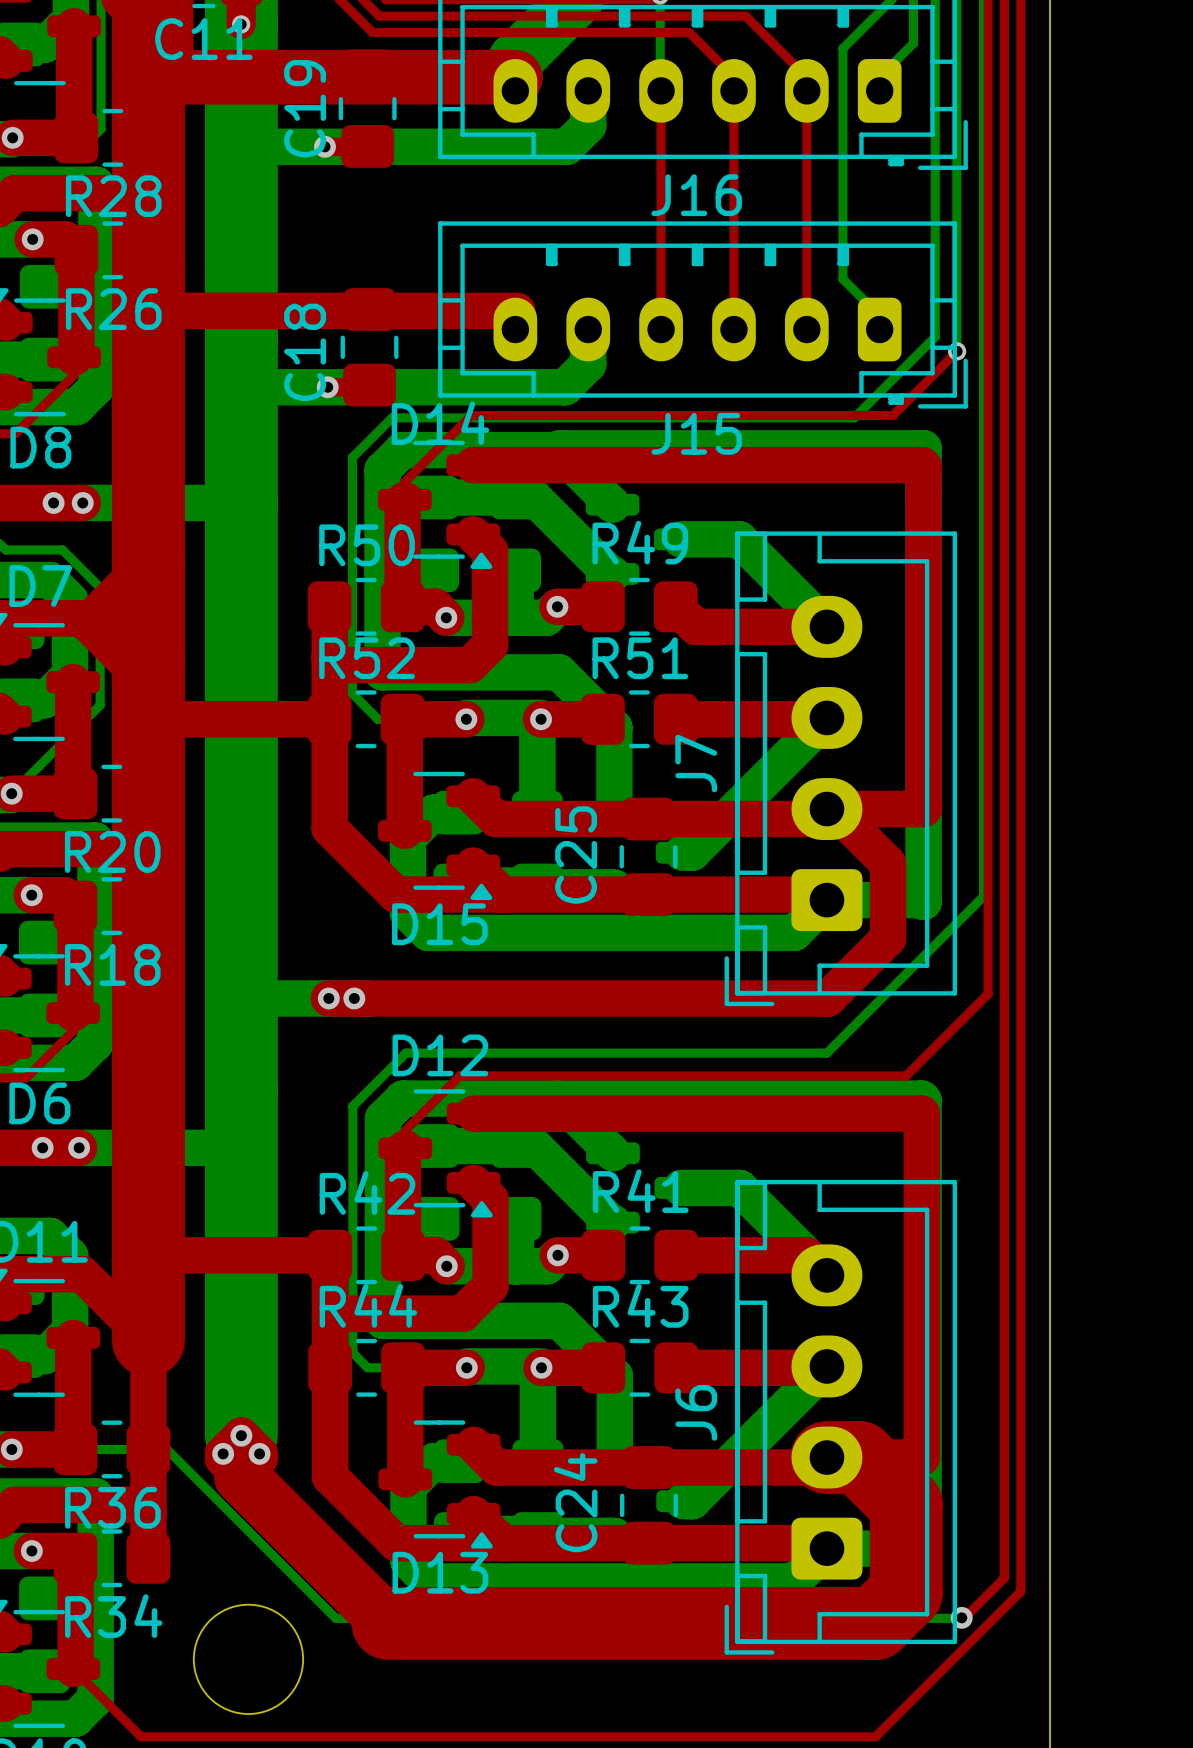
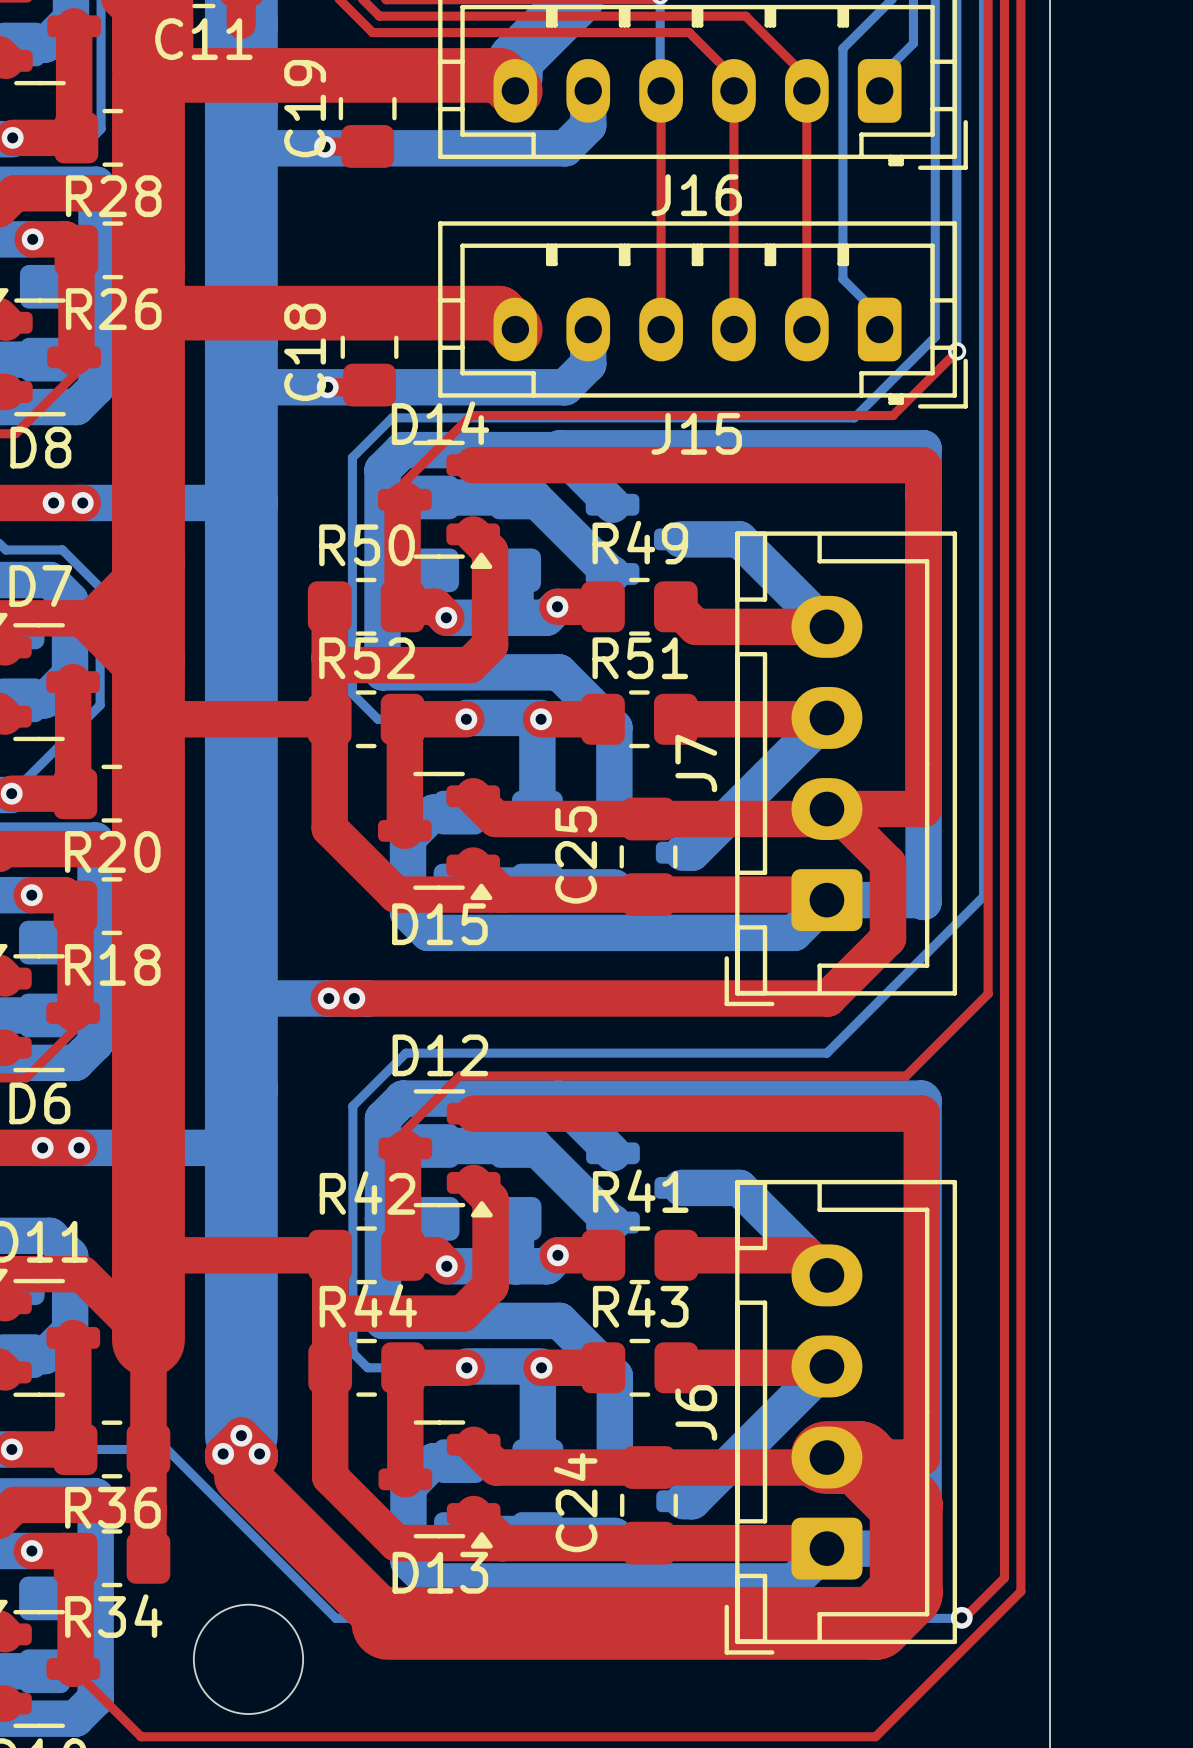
via: (241, 24) -> none
top track: none -> (148, 75) (499, 75) (515, 90)
top track: (150, 77) (515, 77) -> none
bottom track: (258, 146) (566, 146) -> (241, 148) (566, 146)
top track: (182, 310) (517, 310) -> none
top track: none -> (148, 313) (498, 313) (515, 329)

